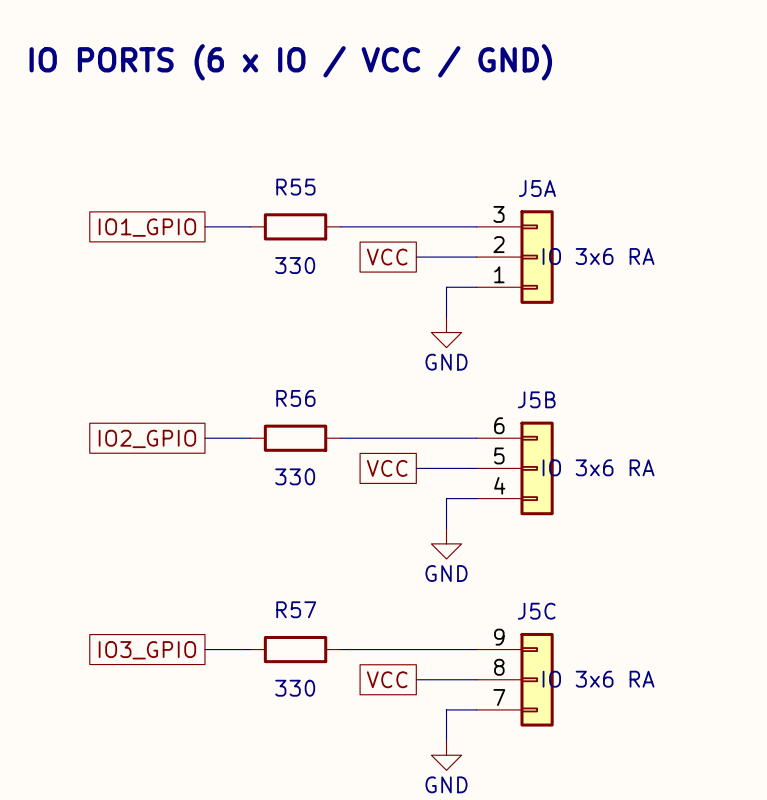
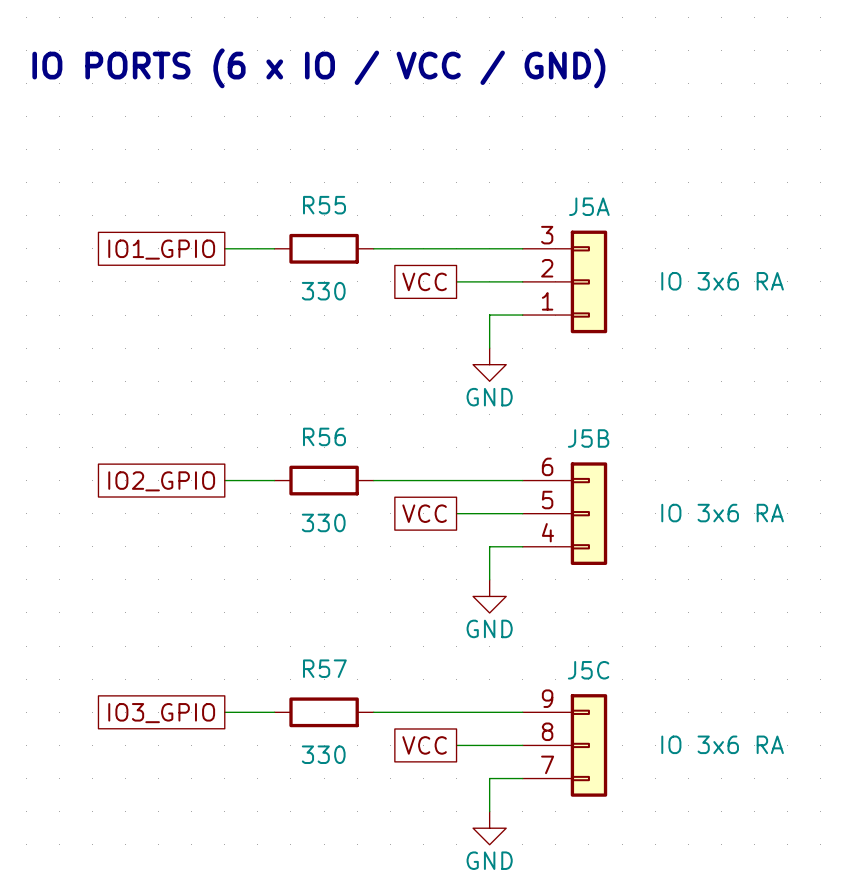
J5A value position: IO 3x6 RA (598, 256) -> IO 3x6 RA (722, 281)
J5B value position: IO 3x6 RA (598, 467) -> IO 3x6 RA (722, 513)
J5C value position: IO 3x6 RA (598, 679) -> IO 3x6 RA (722, 744)

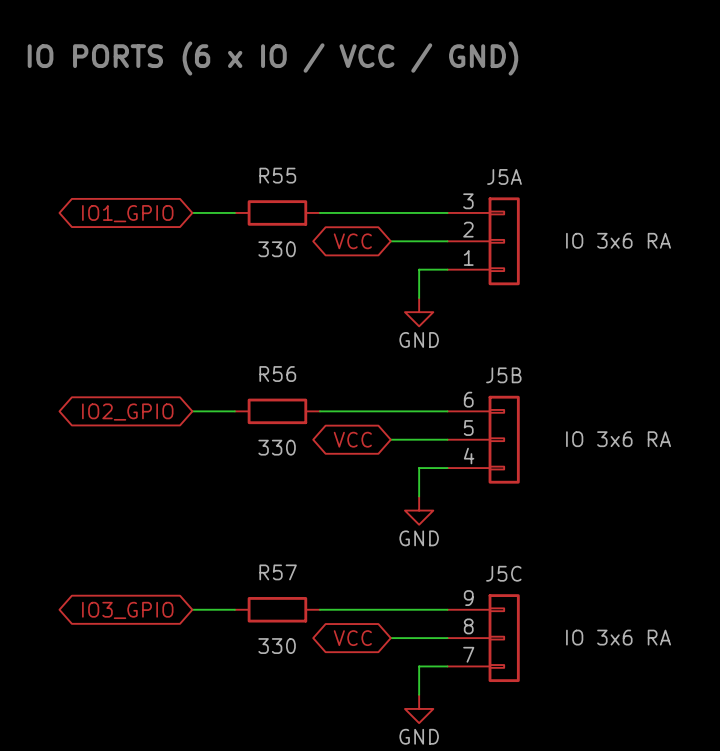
global label shape: passive (161, 249) -> bidirectional (127, 213)
global label shape: passive (424, 281) -> bidirectional (352, 241)
global label shape: passive (161, 481) -> bidirectional (127, 412)
global label shape: passive (424, 513) -> bidirectional (352, 439)
global label shape: passive (161, 713) -> bidirectional (127, 610)
global label shape: passive (424, 745) -> bidirectional (352, 638)

